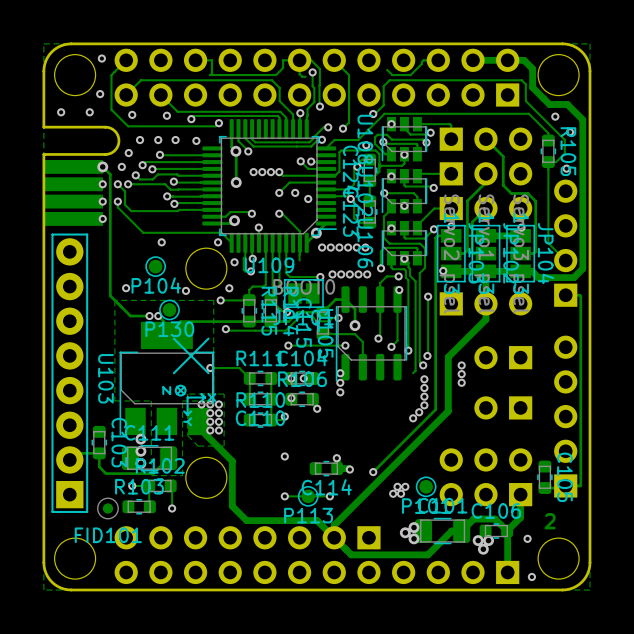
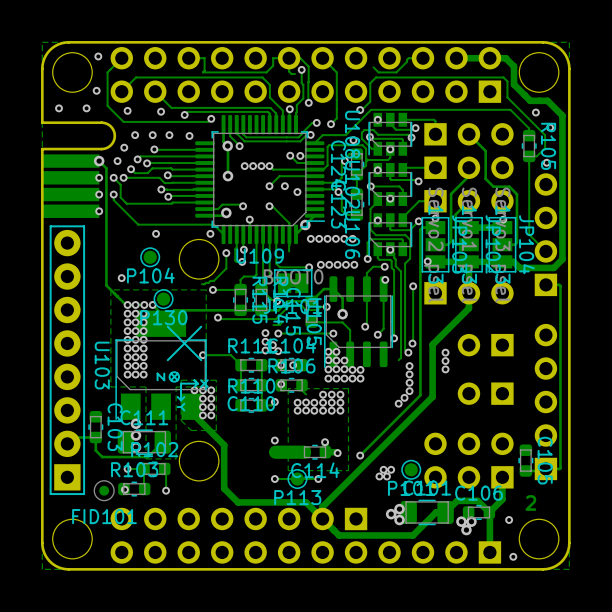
track: none -> (226, 253) (226, 268) (213, 280) (201, 284)
via: (229, 288) -> none
via: (185, 290) -> none
via: none -> (127, 304)
via: none -> (135, 304)
via: none -> (127, 313)
via: none -> (135, 313)
via: none -> (143, 313)
track: none -> (282, 321) (279, 325) (273, 325)
via: none -> (127, 322)
via: none -> (135, 322)
via: none -> (143, 322)
via: none -> (127, 331)
via: none -> (135, 331)
via: none -> (143, 331)
via: none -> (265, 333)
via: none -> (127, 339)
via: none -> (135, 339)
via: none -> (143, 339)
via: none -> (265, 341)
via: none -> (272, 345)
via: none -> (127, 348)
via: none -> (135, 348)
via: none -> (143, 348)
via: none -> (265, 350)
via: none -> (278, 351)
via: none -> (328, 351)
via: none -> (336, 351)
via: none -> (127, 357)
via: none -> (135, 357)
via: none -> (143, 357)
via: none -> (336, 360)
via: none -> (344, 360)
via: none -> (127, 365)
via: none -> (135, 365)
via: none -> (143, 365)
via: none -> (336, 369)
via: none -> (344, 369)
via: none -> (352, 369)
via: none -> (360, 369)
via: none -> (127, 374)
via: none -> (135, 374)
via: none -> (143, 374)
via: none -> (336, 378)
via: none -> (344, 378)
via: none -> (352, 378)
via: none -> (360, 378)
zone outline: none -> (348, 388) (348, 470) (288, 470) (288, 388) (348, 388)
via: (317, 408) -> none
via: none -> (323, 394)
via: none -> (331, 394)
via: none -> (340, 394)
via: none -> (297, 402)
via: none -> (306, 402)
via: none -> (314, 402)
via: none -> (323, 402)
via: none -> (331, 402)
via: none -> (340, 402)
via: none -> (297, 410)
via: none -> (306, 410)
via: none -> (314, 410)
via: none -> (323, 410)
via: none -> (331, 410)
via: none -> (340, 410)
track: none -> (304, 452) (275, 452)
via: none -> (124, 489)

